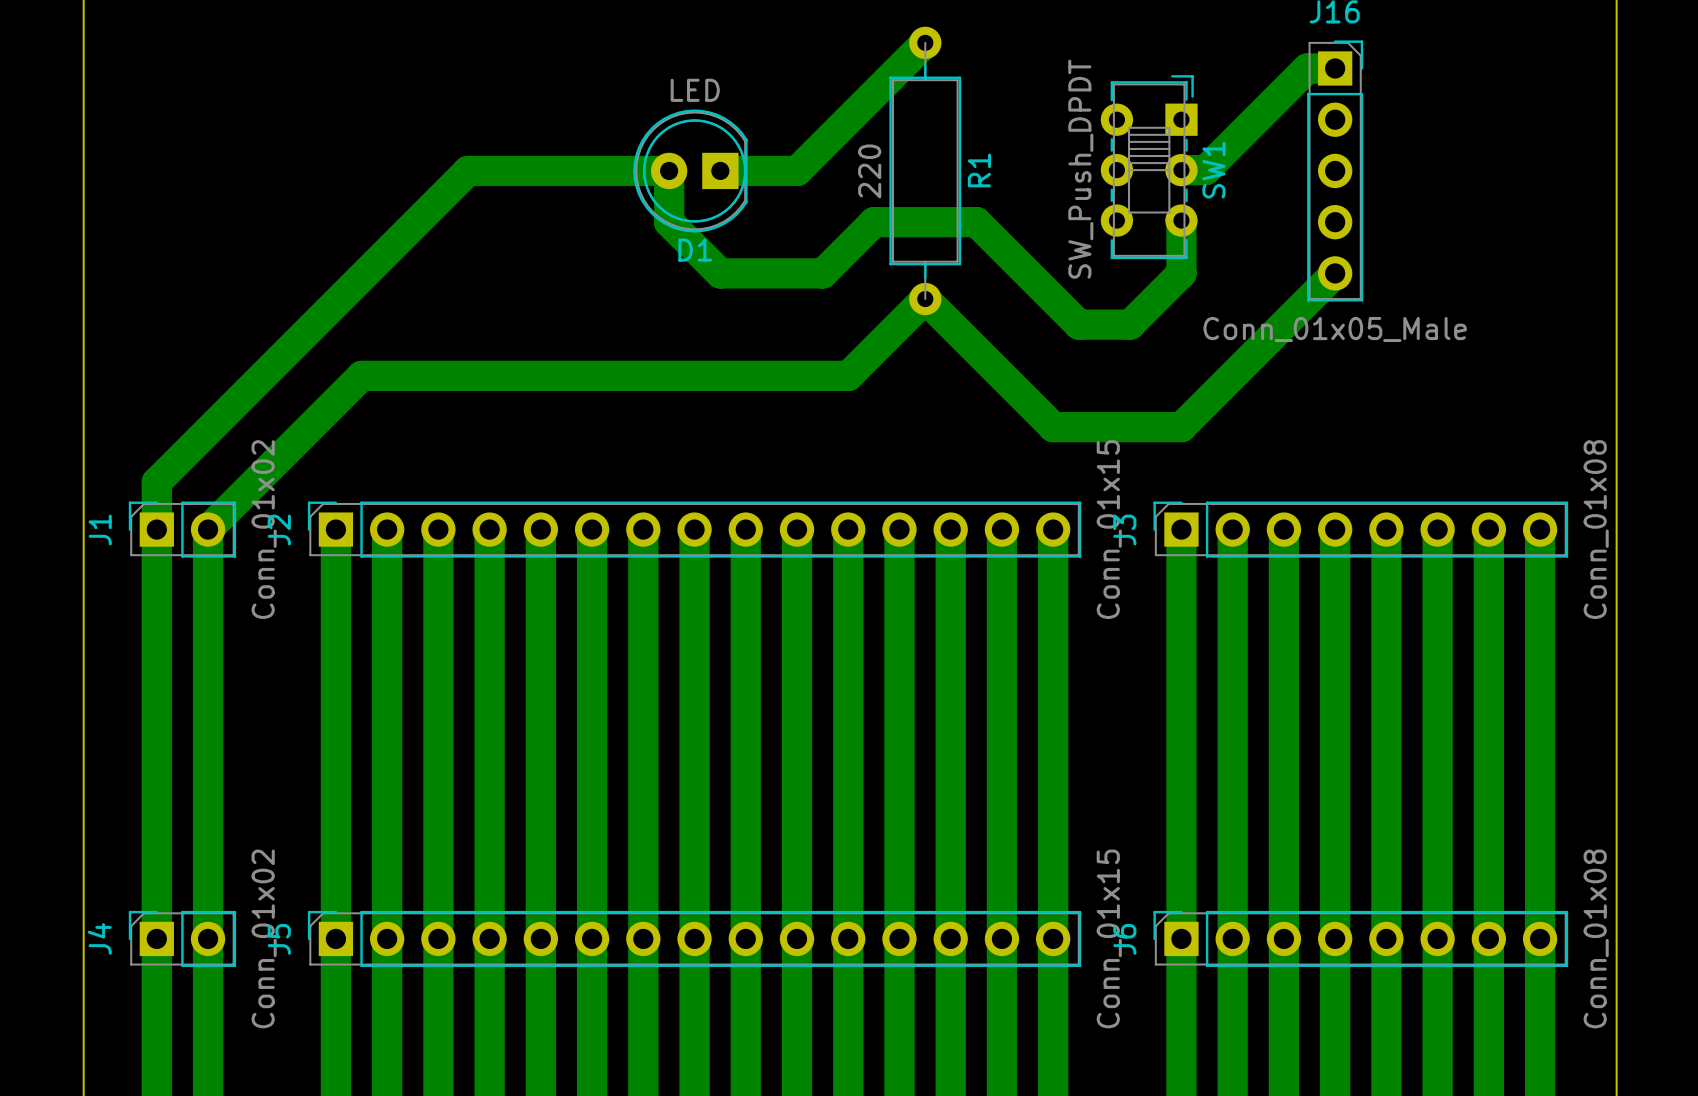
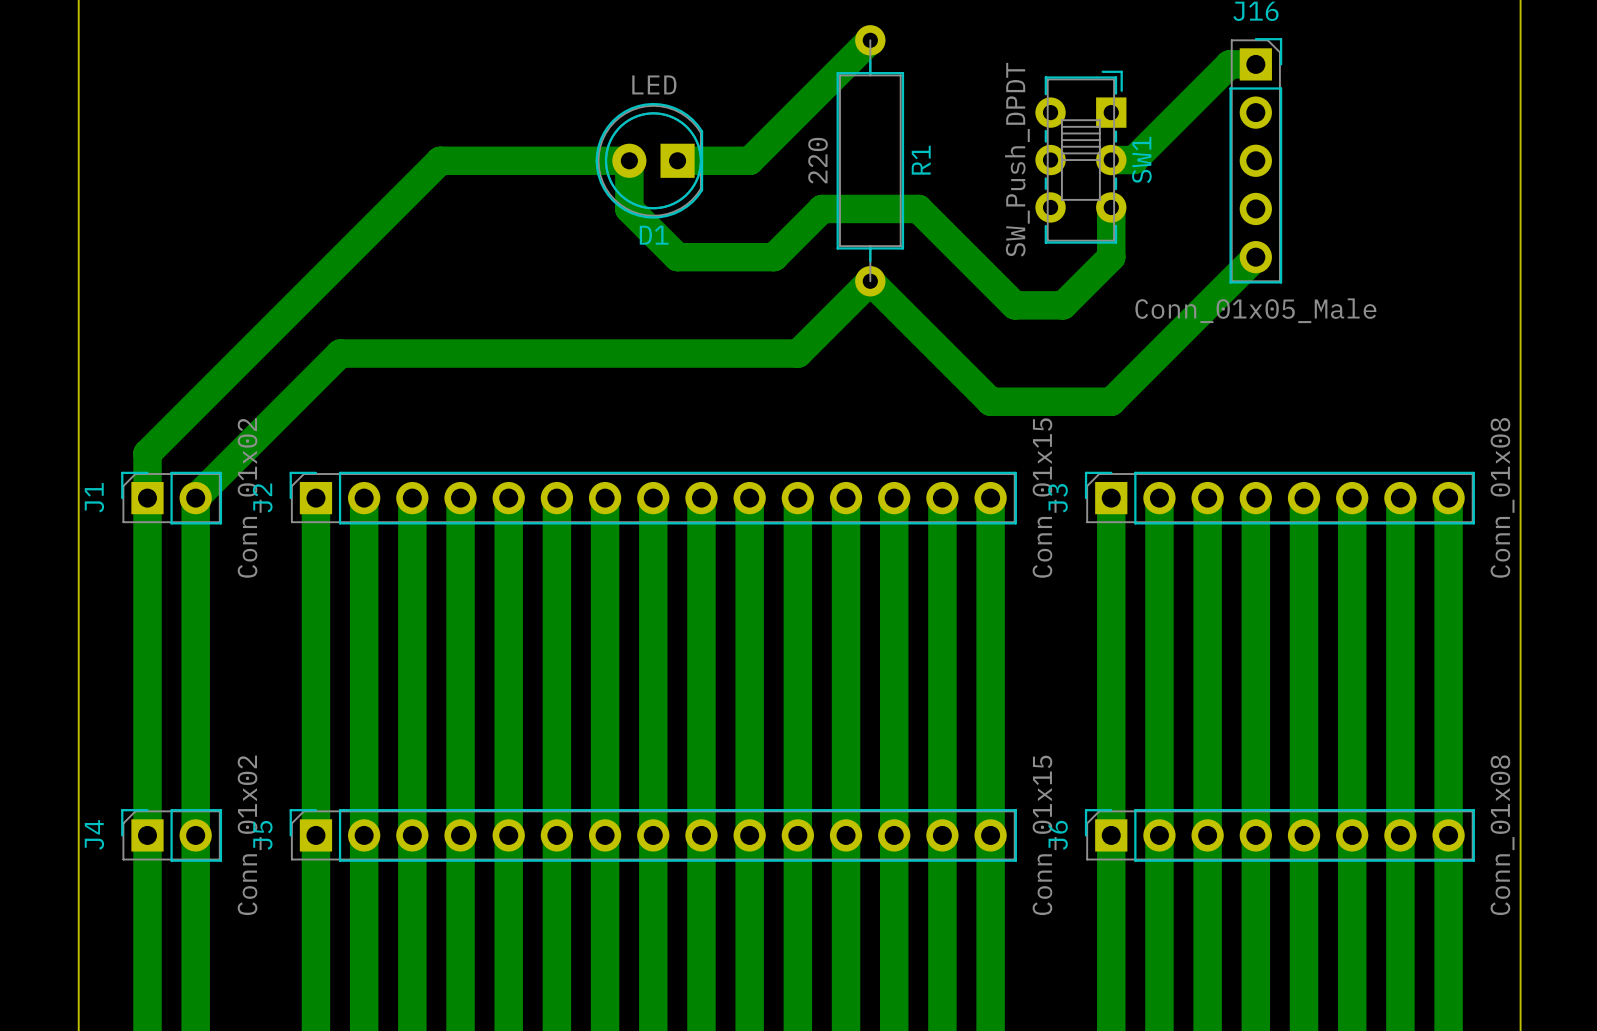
J4 position: (182, 938) -> (171, 835)
J5 position: (694, 938) -> (653, 835)
J6 position: (1360, 938) -> (1279, 835)

